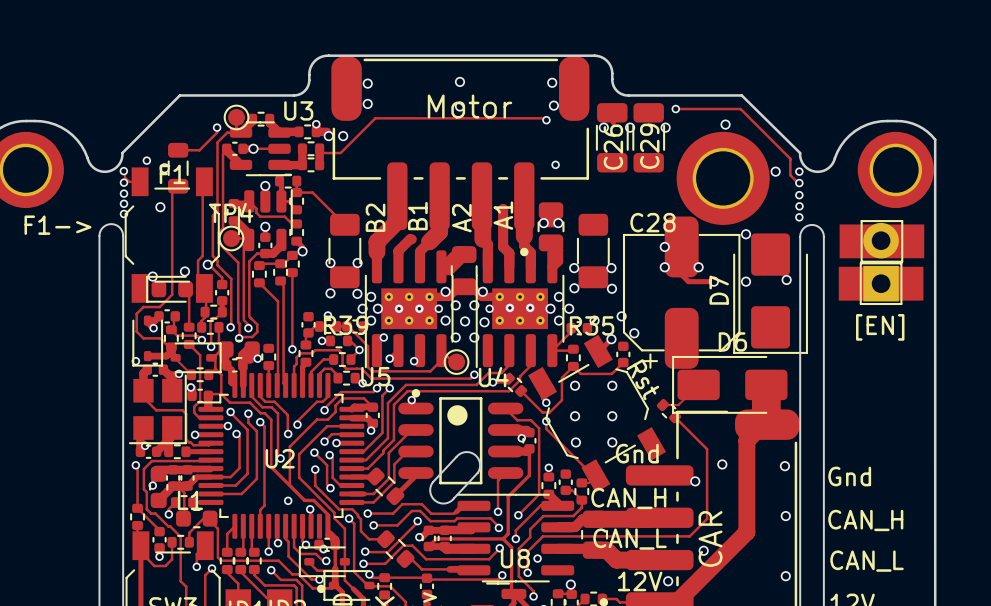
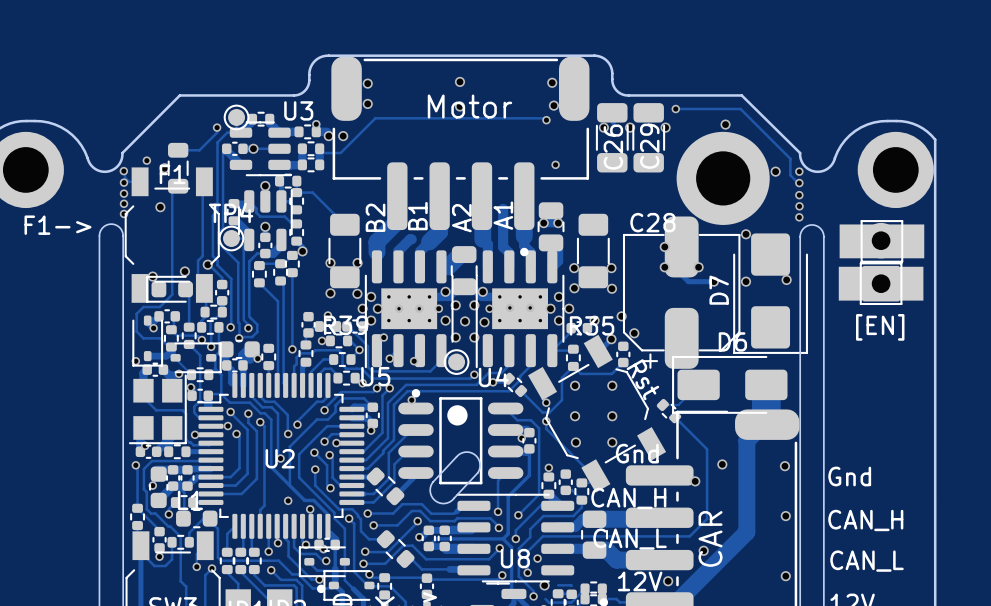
via position: (570, 584) -> (544, 585)
track: none -> (558, 585) (571, 585)
track: none -> (585, 588) (571, 602) (549, 602) (545, 599)
part: none -> (593, 588)

